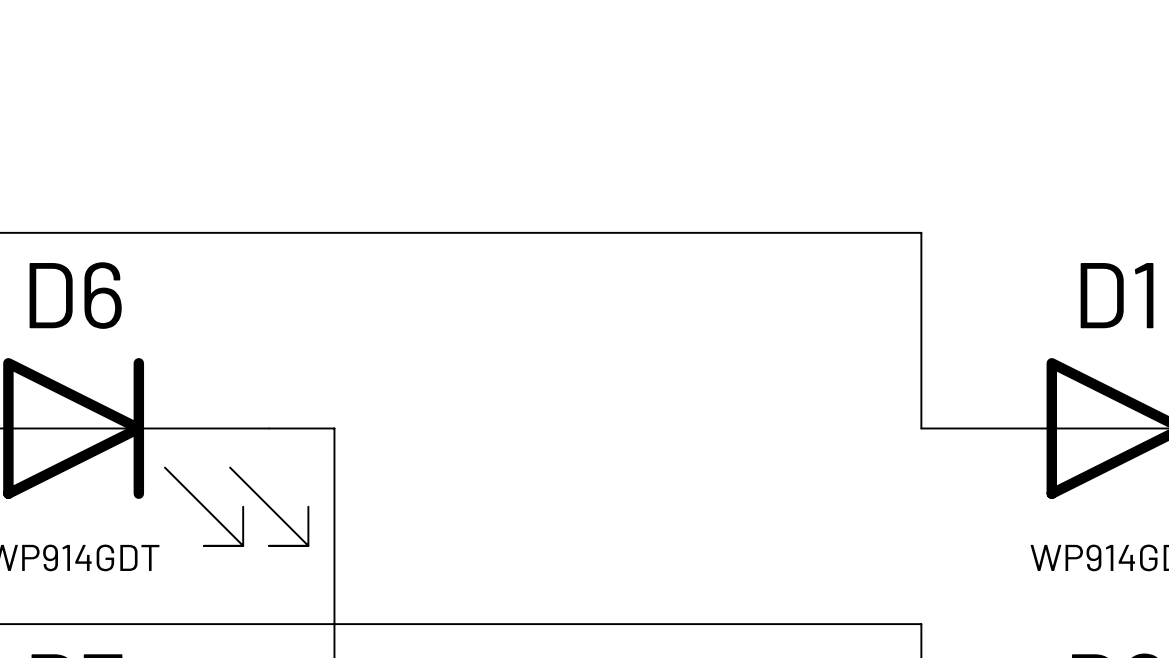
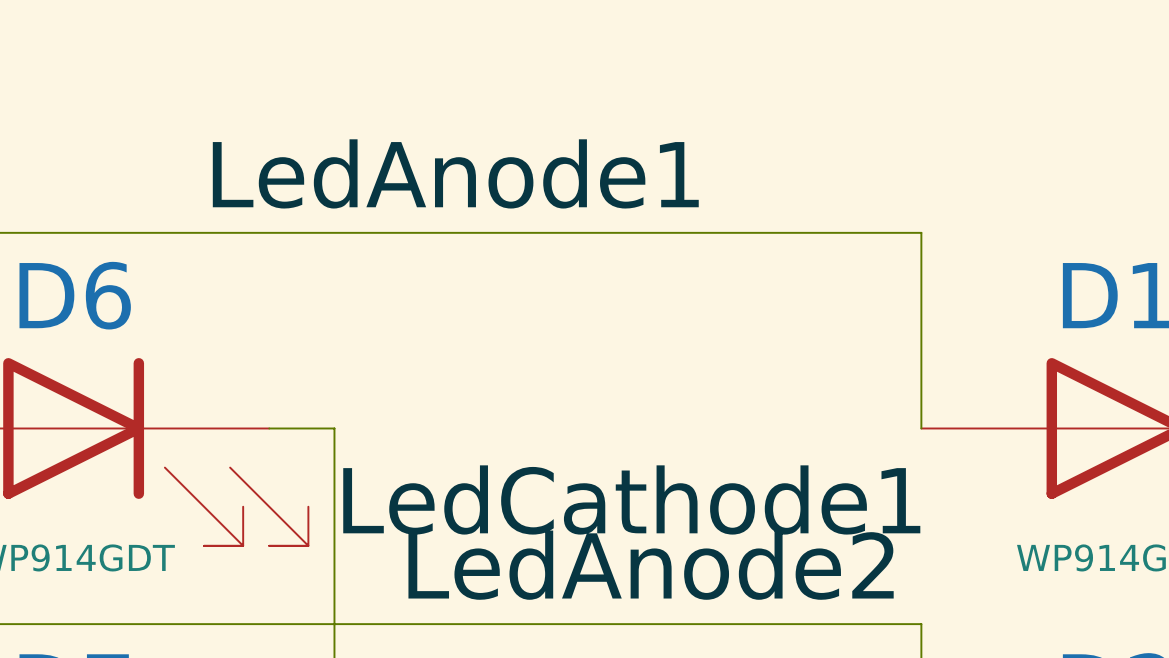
label: none -> LedAnode1 (455, 173)
label: none -> LedCathode1 (631, 499)
label: none -> LedAnode2 (651, 565)

